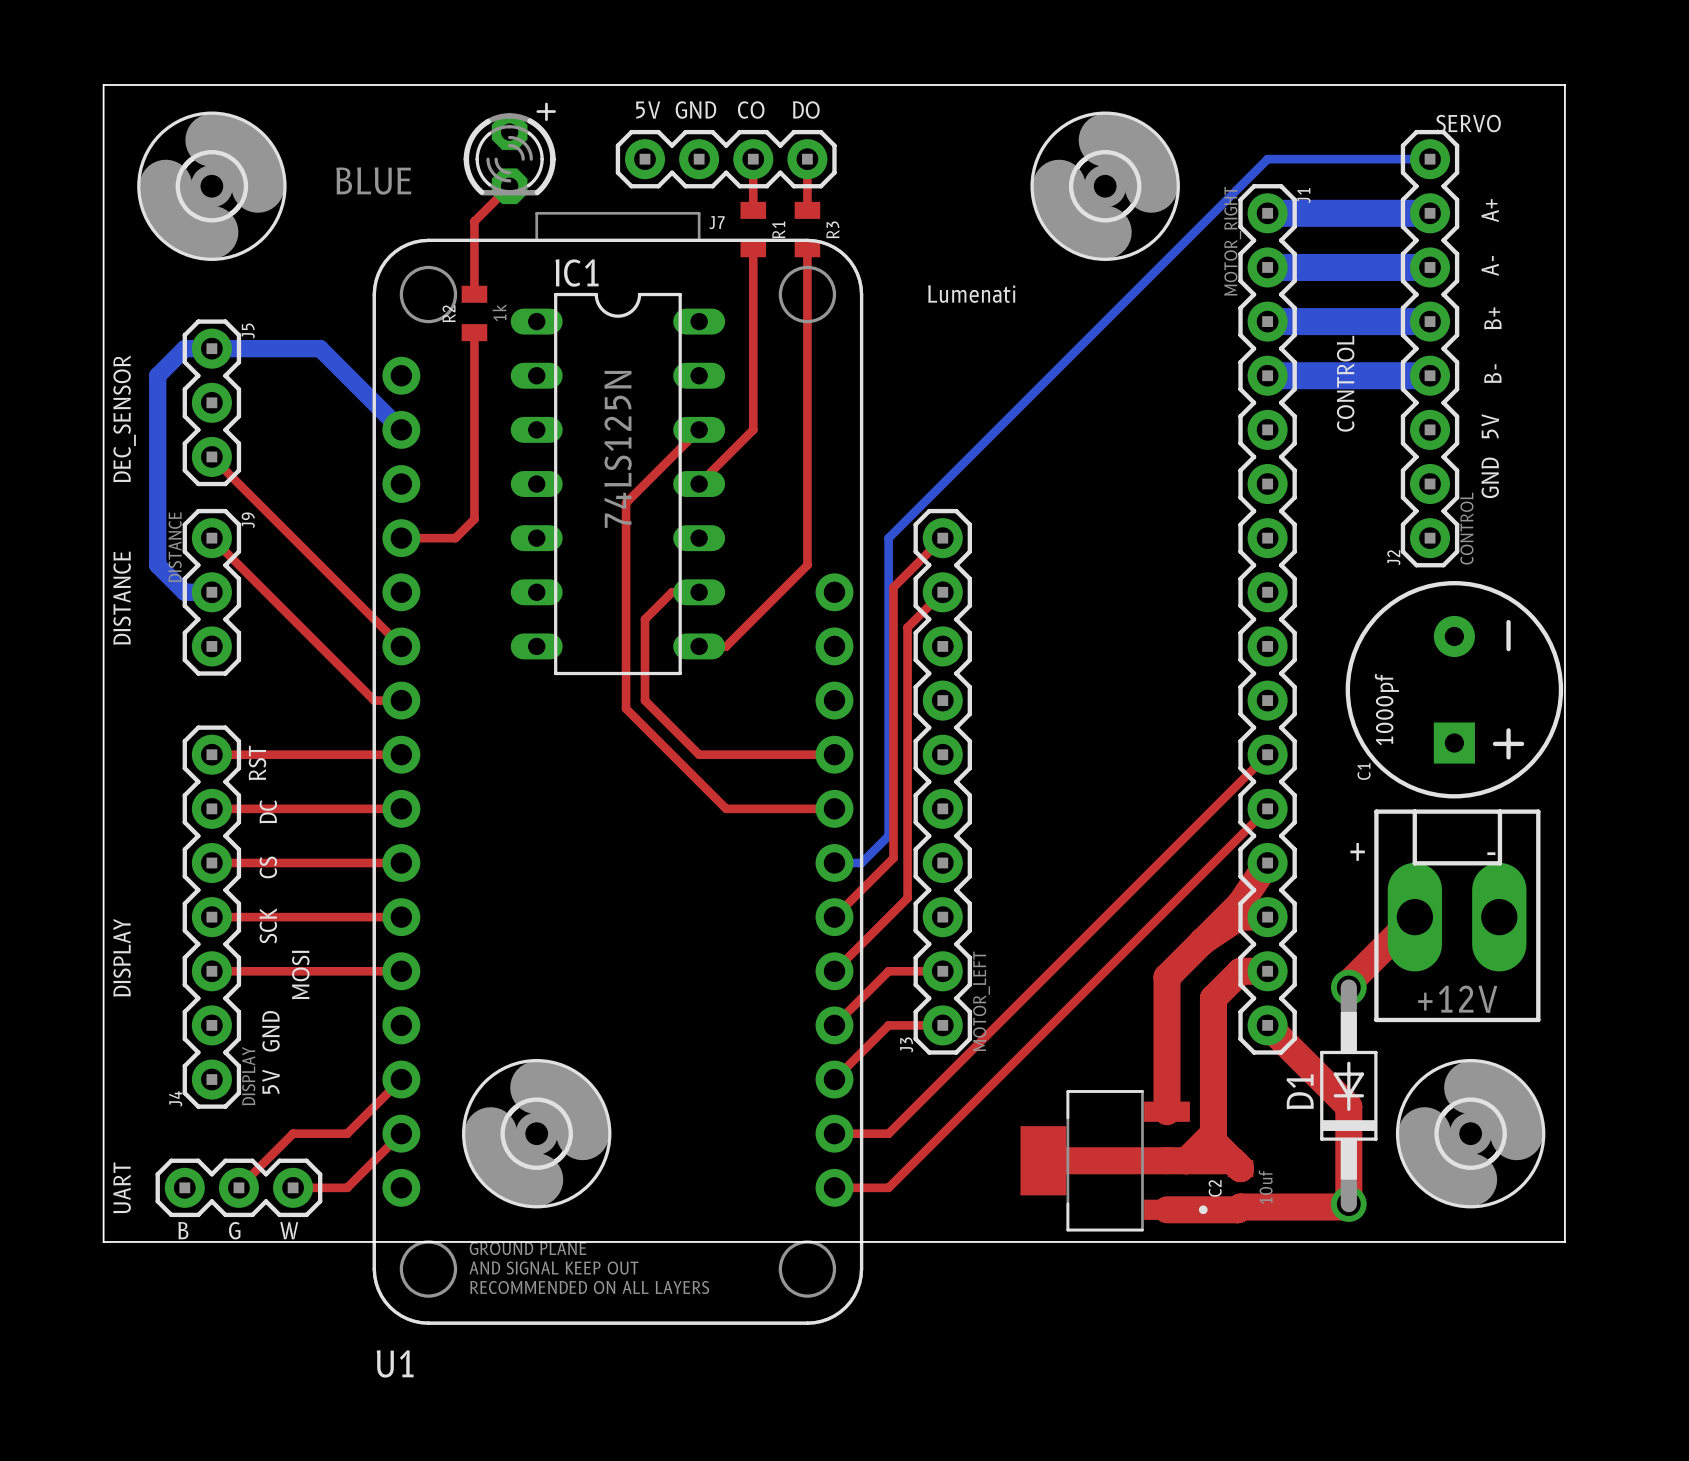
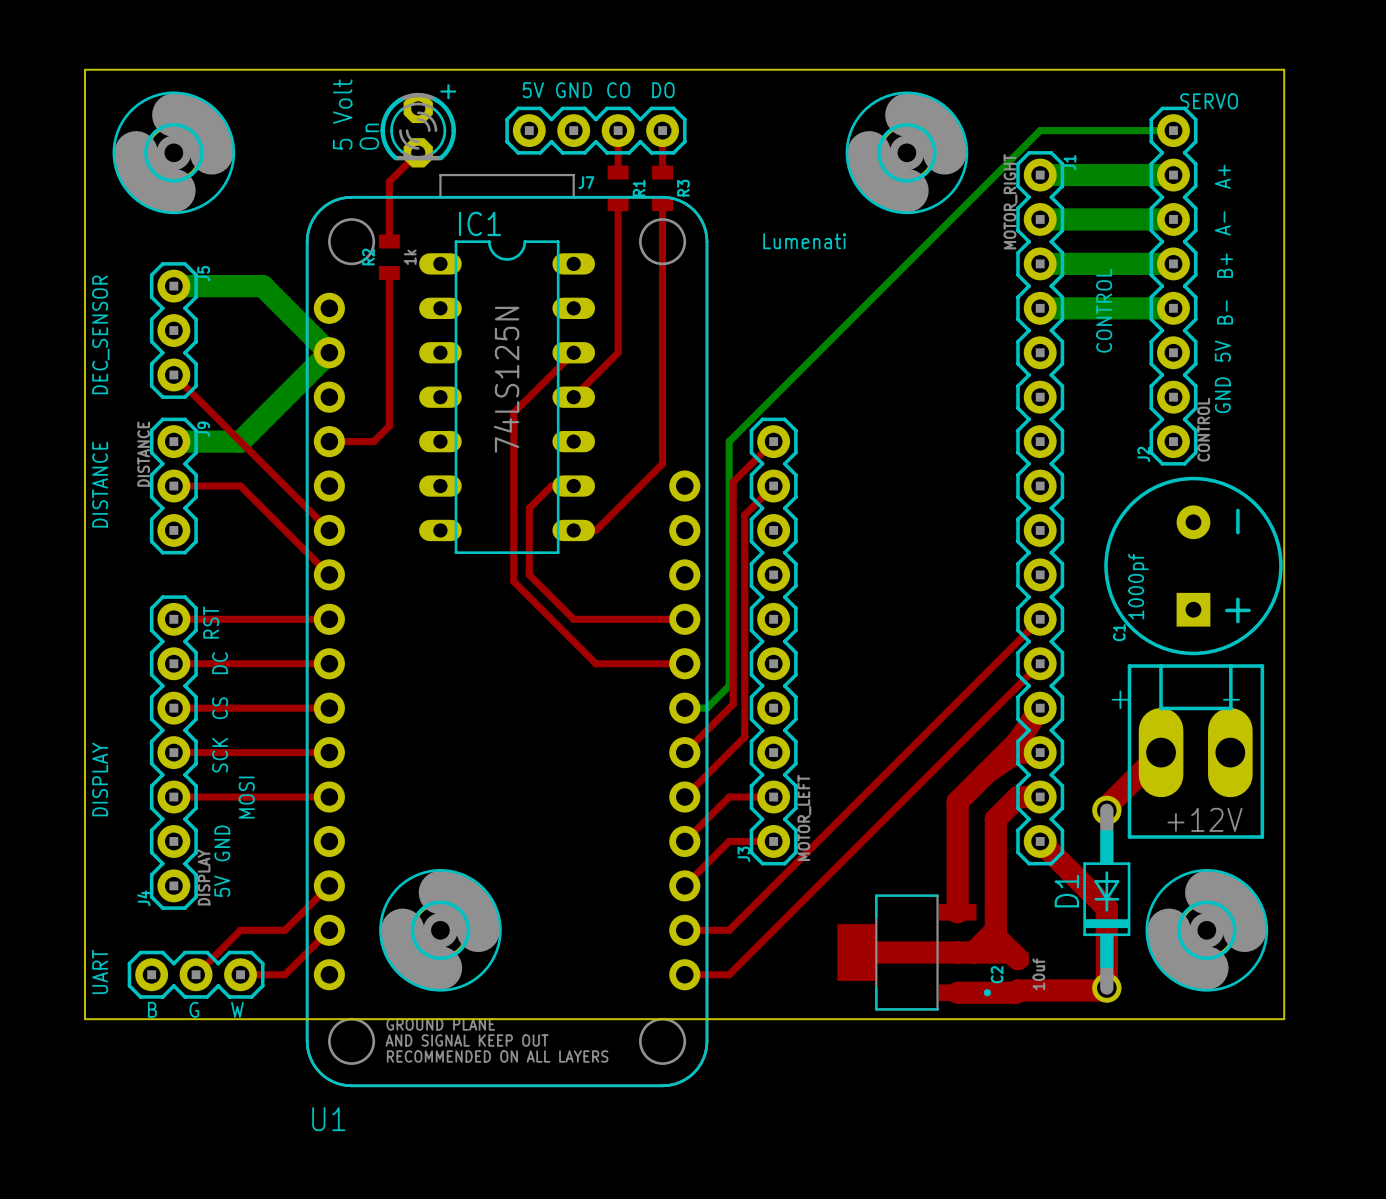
text: none -> 5 Volt (342, 114)
text: none -> On (369, 136)
part value: BLUE (373, 180) -> none
bottom track: (211, 348) (184, 348) (157, 375) (157, 565) (184, 592) (211, 592) -> none
bottom track width: thin (211, 348) (320, 348) (401, 429) -> thick (173, 286) (262, 286) (329, 352)
bottom track: none -> (329, 352) (240, 441) (173, 441)
top track: (211, 538) (374, 700) (401, 700) -> (173, 486) (240, 486) (329, 574)

